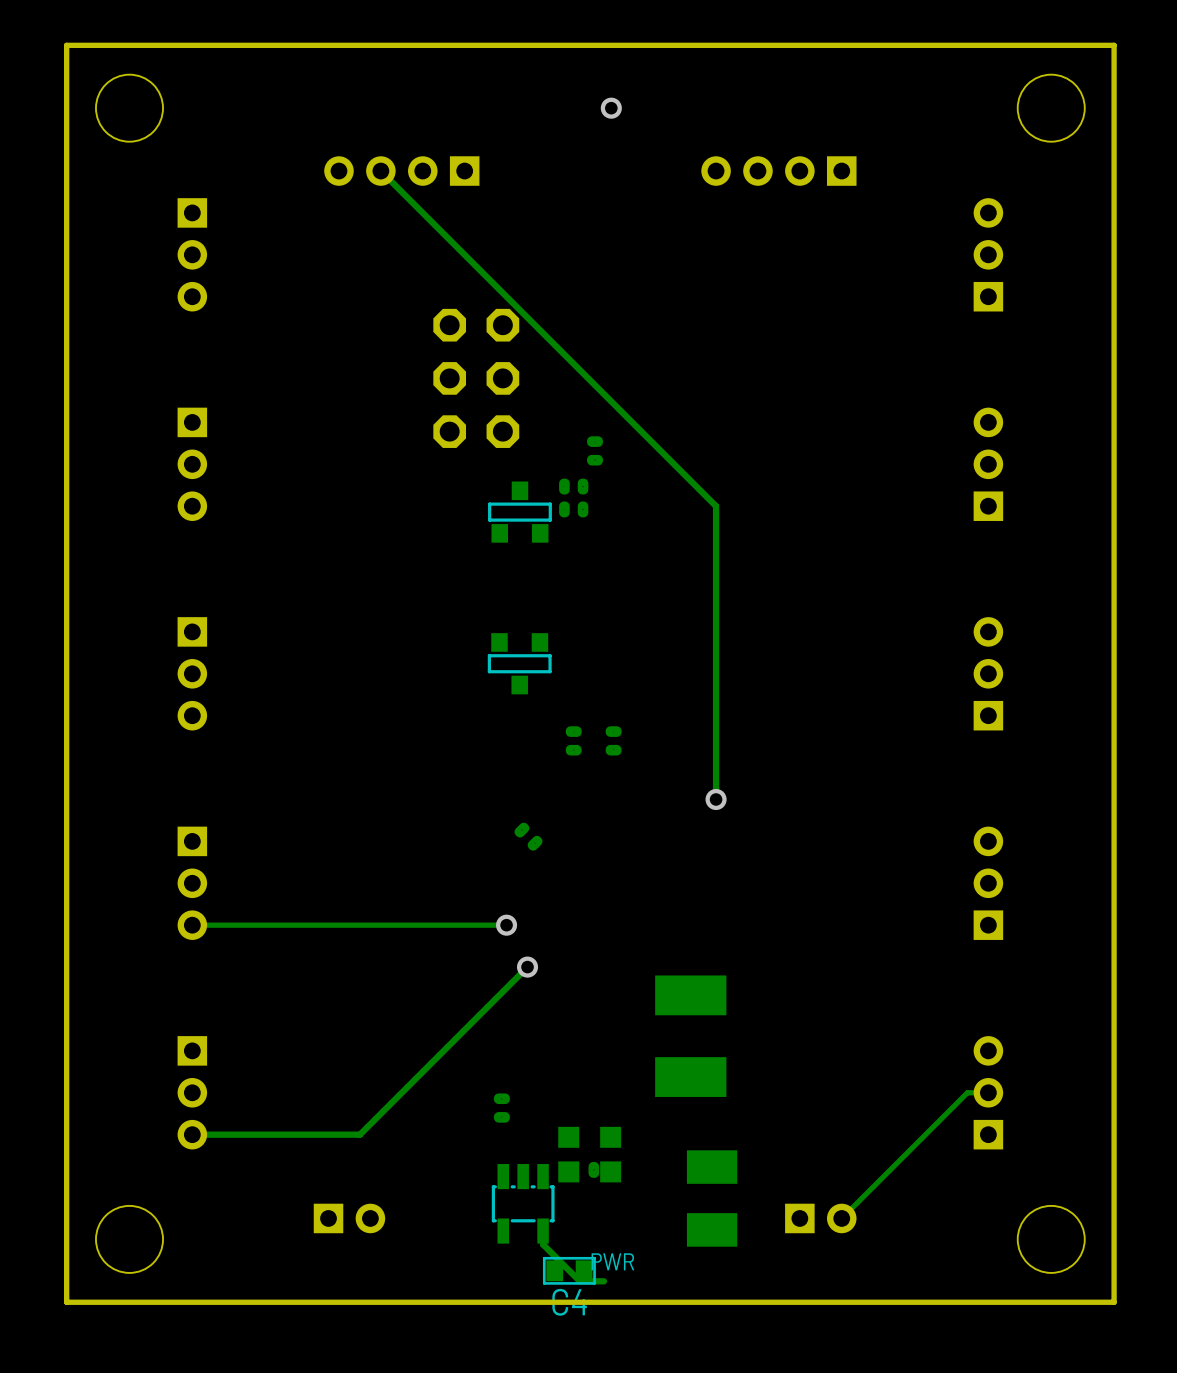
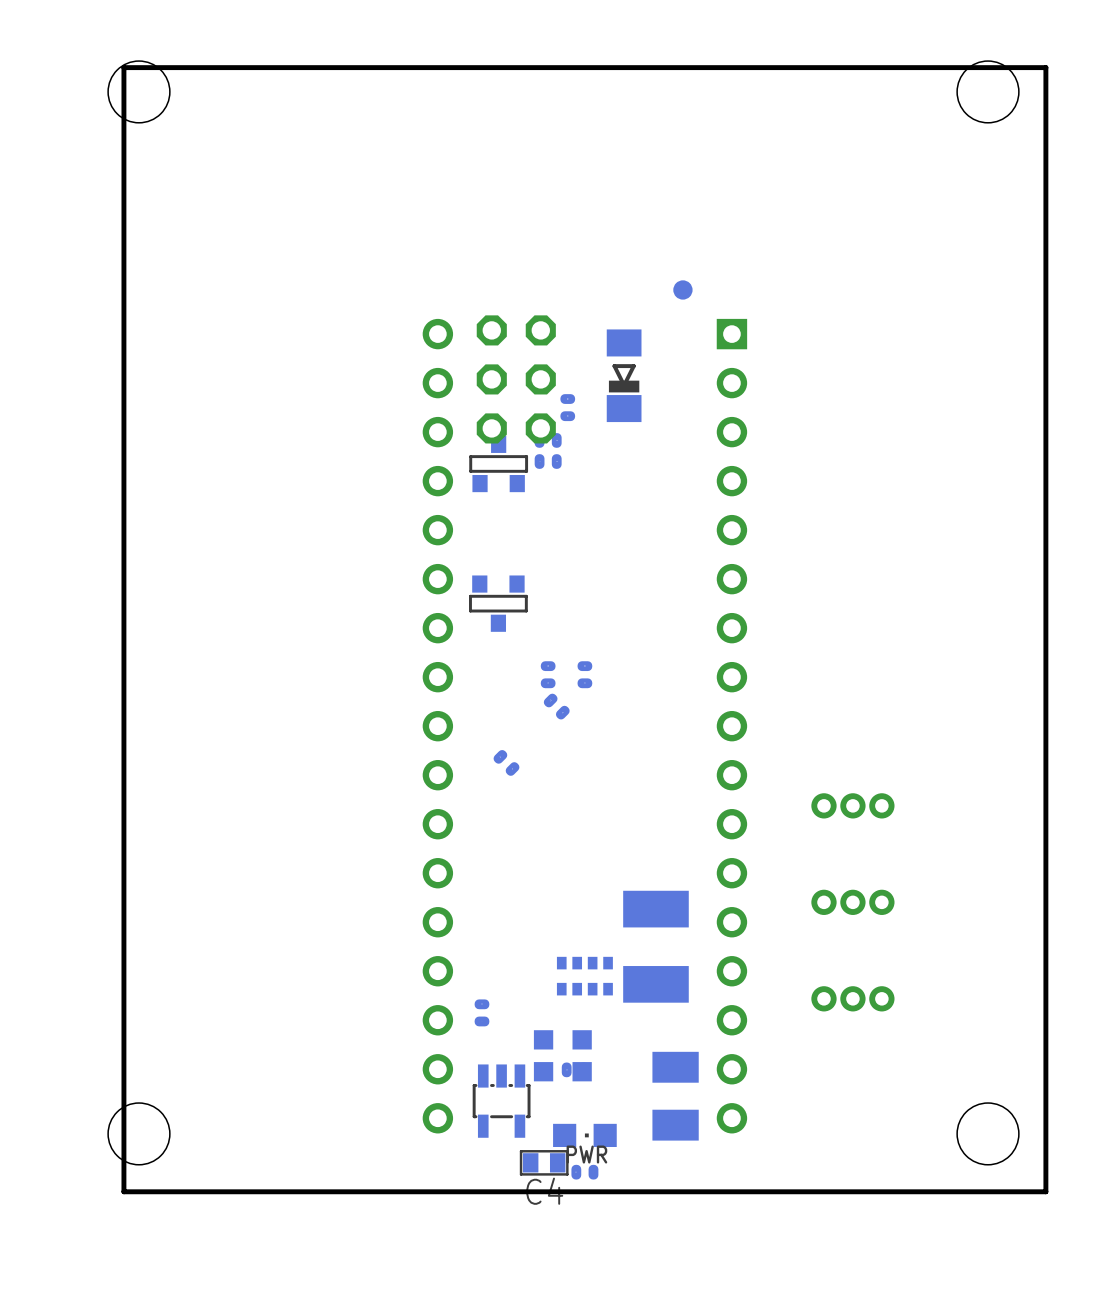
board edge: (1114, 81) (1114, 45) (66, 45) (66, 1302) (113, 1302) -> (1045, 67) (123, 67) (123, 1191)
via: (611, 108) -> none
track: (380, 171) (716, 506) (716, 799) -> none
part: (401, 171) -> none
part: (778, 171) -> none
part: (192, 254) -> none
part: (988, 254) -> none
part: none -> (682, 289)
part position: (476, 378) -> (516, 379)
part: none -> (624, 375)
part: (192, 464) -> none
part: (988, 464) -> none
part: (192, 673) -> none
part: (988, 673) -> none
part: none -> (556, 706)
part: none -> (437, 726)
part: none -> (731, 726)
via: (716, 799) -> none
part: (192, 883) -> none
part: none -> (852, 805)
part: (988, 883) -> none
track: (506, 925) (192, 925) -> none
via: (506, 925) -> none
track: (527, 967) (359, 1134) (192, 1134) -> none
via: (527, 967) -> none
part: none -> (852, 902)
part: none -> (584, 976)
part: (192, 1092) -> none
part: none -> (852, 998)
track: (988, 1092) (967, 1092) (841, 1218) -> none
part: (988, 1092) -> none
part: (349, 1218) -> none
part: (820, 1218) -> none
track: (543, 1231) (543, 1244) (579, 1281) (603, 1281) -> none
part: none -> (584, 1135)
part: none -> (584, 1172)

